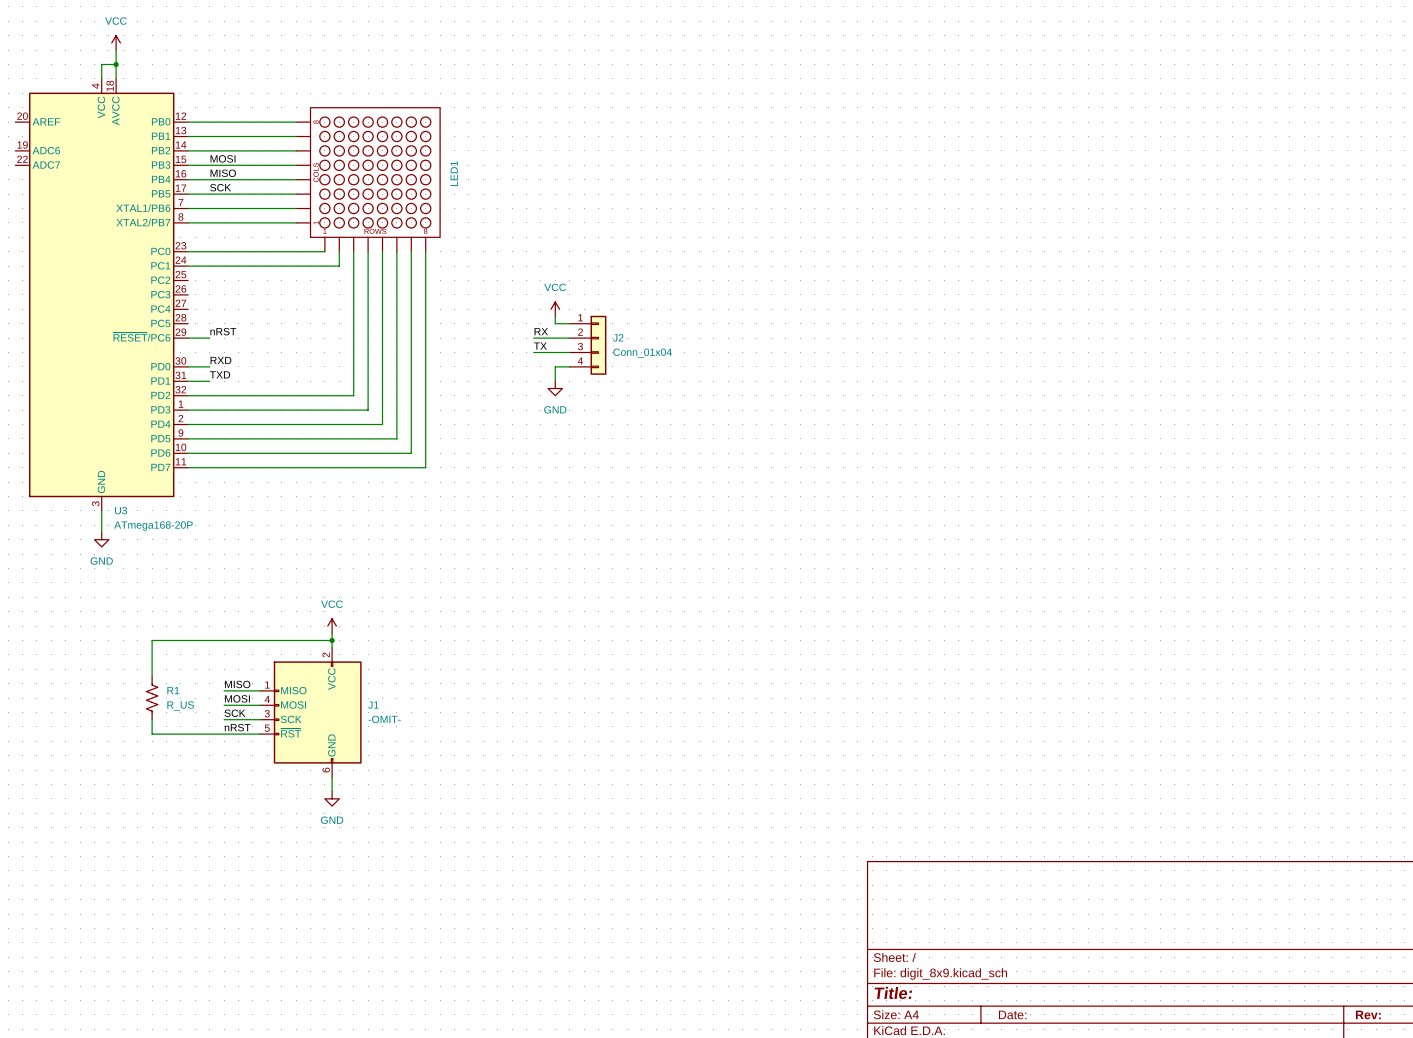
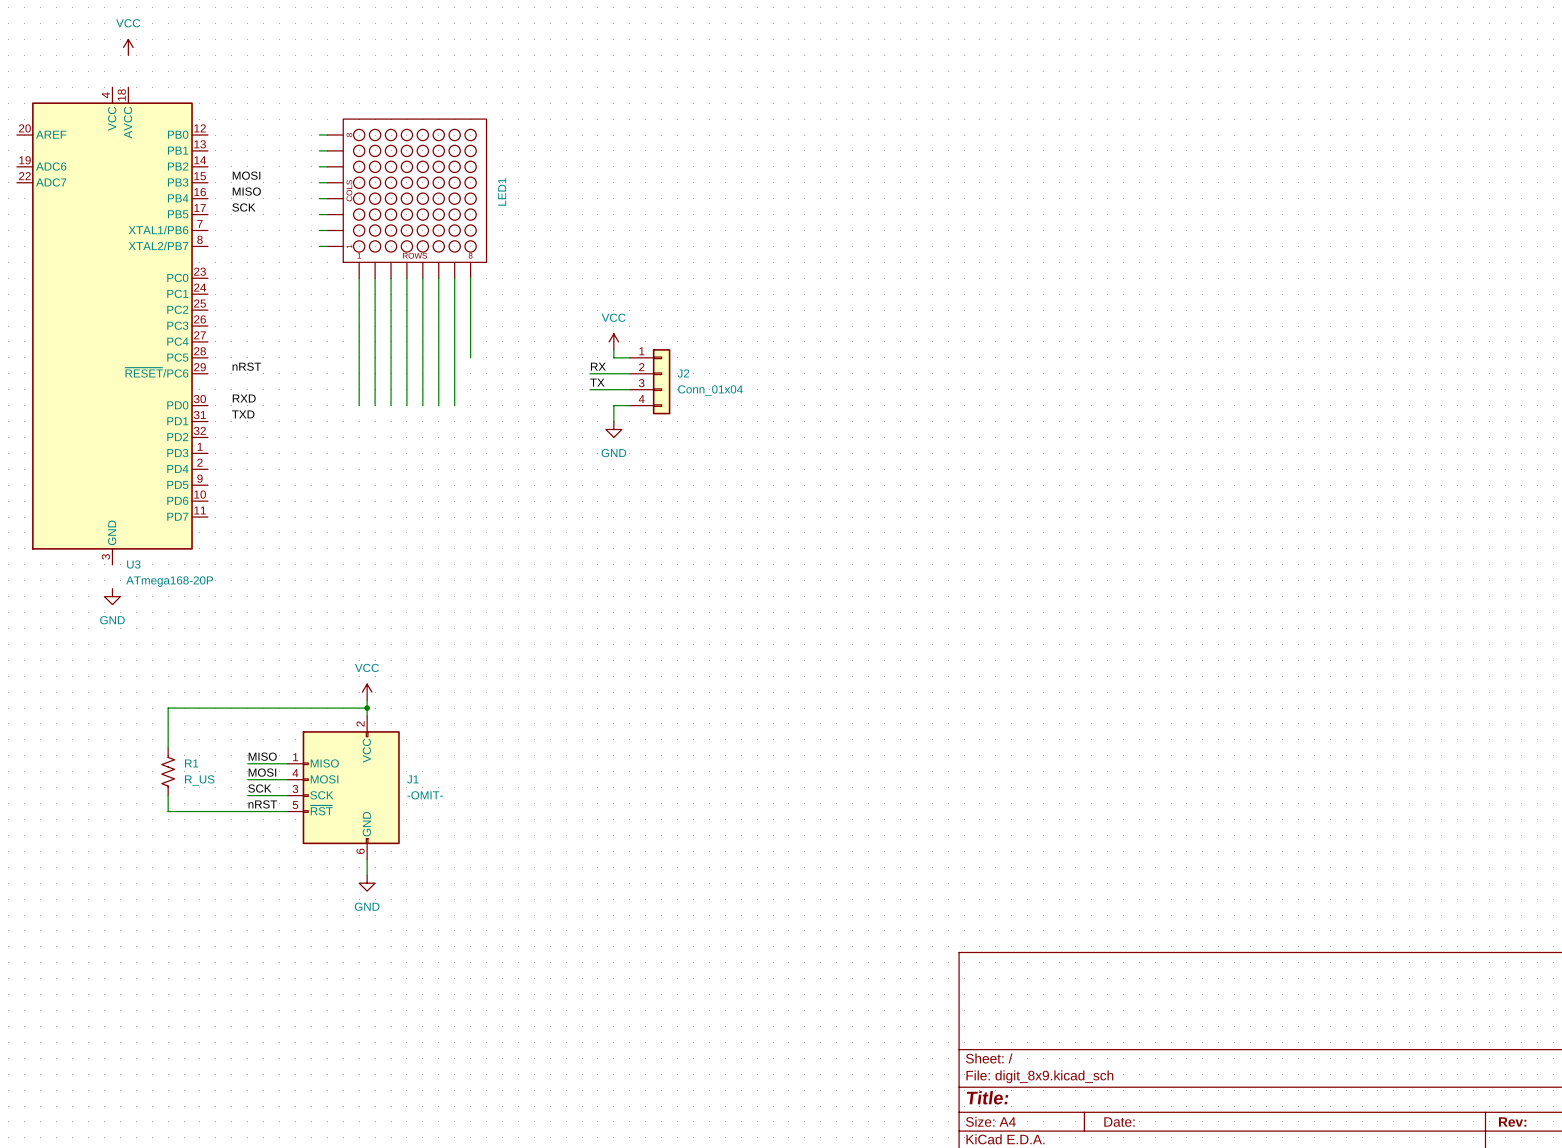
wire: (116, 50) (116, 78) -> none
wire: (116, 64) (101, 64) (101, 78) -> none
junction: (116, 64) -> none
wire: (188, 122) (288, 122) -> none
wire: (188, 136) (288, 136) -> none
wire: (188, 150) (288, 150) -> none
wire: (188, 165) (288, 165) -> none
wire: (188, 179) (288, 179) -> none
wire: (188, 194) (288, 194) -> none
wire: (188, 208) (288, 208) -> none
wire: (188, 222) (288, 222) -> none
wire: (188, 251) (324, 251) -> (359, 405) (359, 278)
wire: (188, 266) (339, 266) -> (375, 405) (375, 294)
wire: (425, 323) (425, 467) (188, 467) -> none
wire: (188, 338) (209, 338) -> none
wire: (188, 366) (209, 366) -> none
wire: (353, 366) (353, 395) (188, 395) -> none
wire: (368, 366) (368, 410) (188, 410) -> none
wire: (382, 366) (382, 424) (188, 424) -> none
wire: (396, 366) (396, 438) (188, 438) -> none
wire: (411, 366) (411, 453) (188, 453) -> none
wire: (188, 381) (209, 381) -> none
wire: (101, 510) (101, 532) -> none

